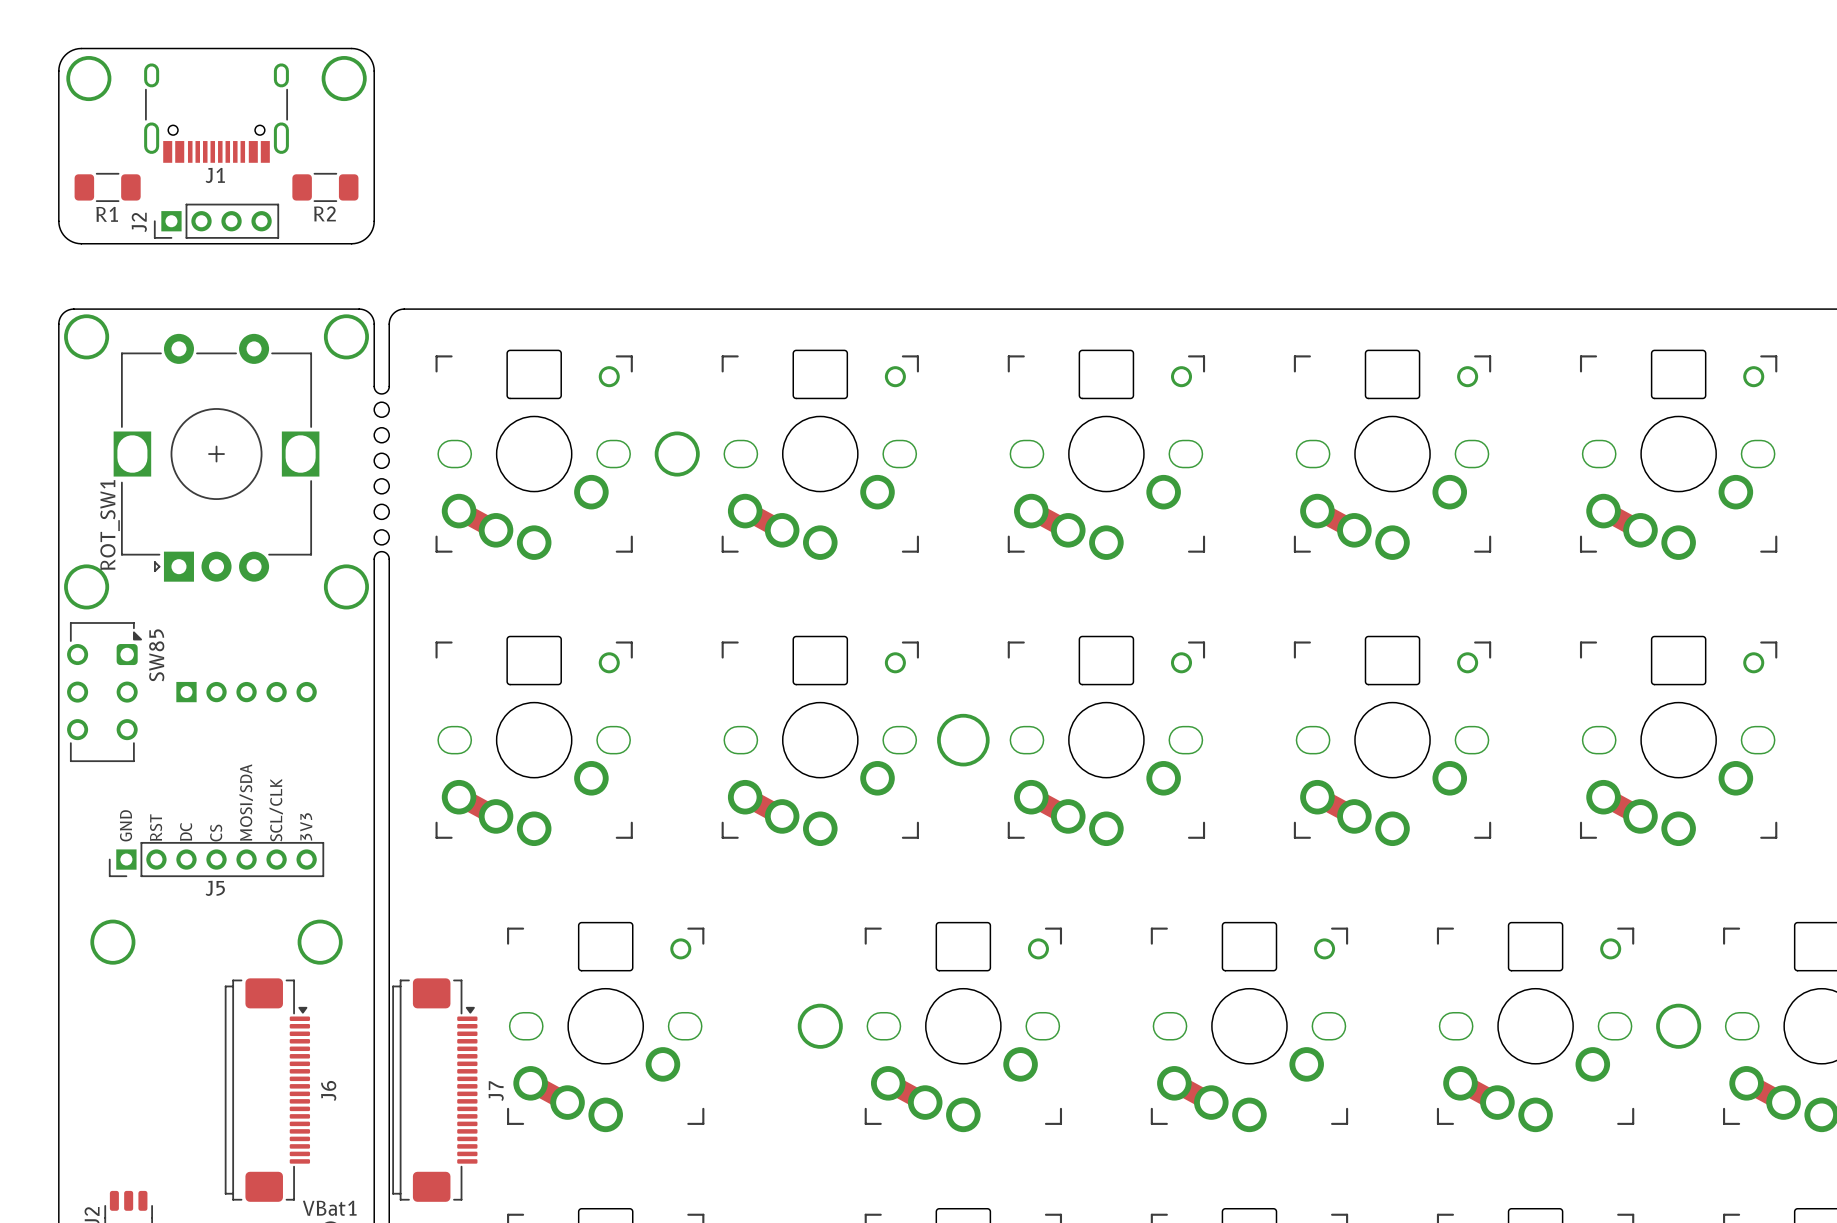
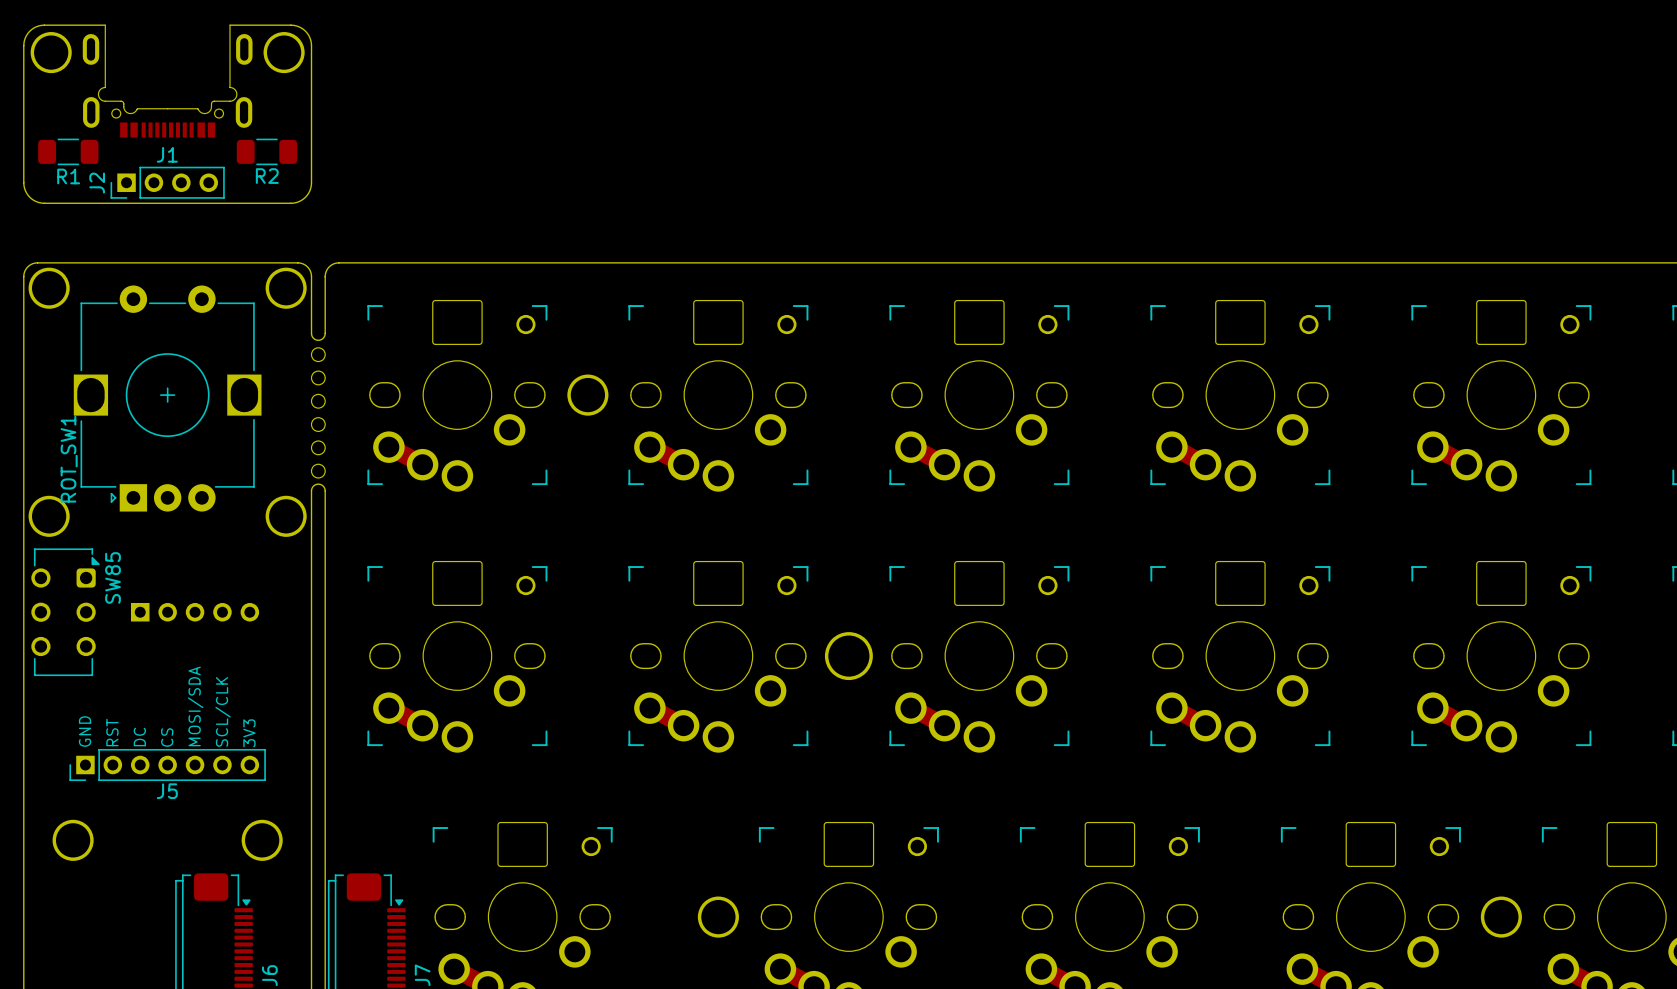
board edge: (148, 48) (284, 48) -> none
J1 footprint: [144, 63, 289, 163] -> [82, 24, 253, 138]

